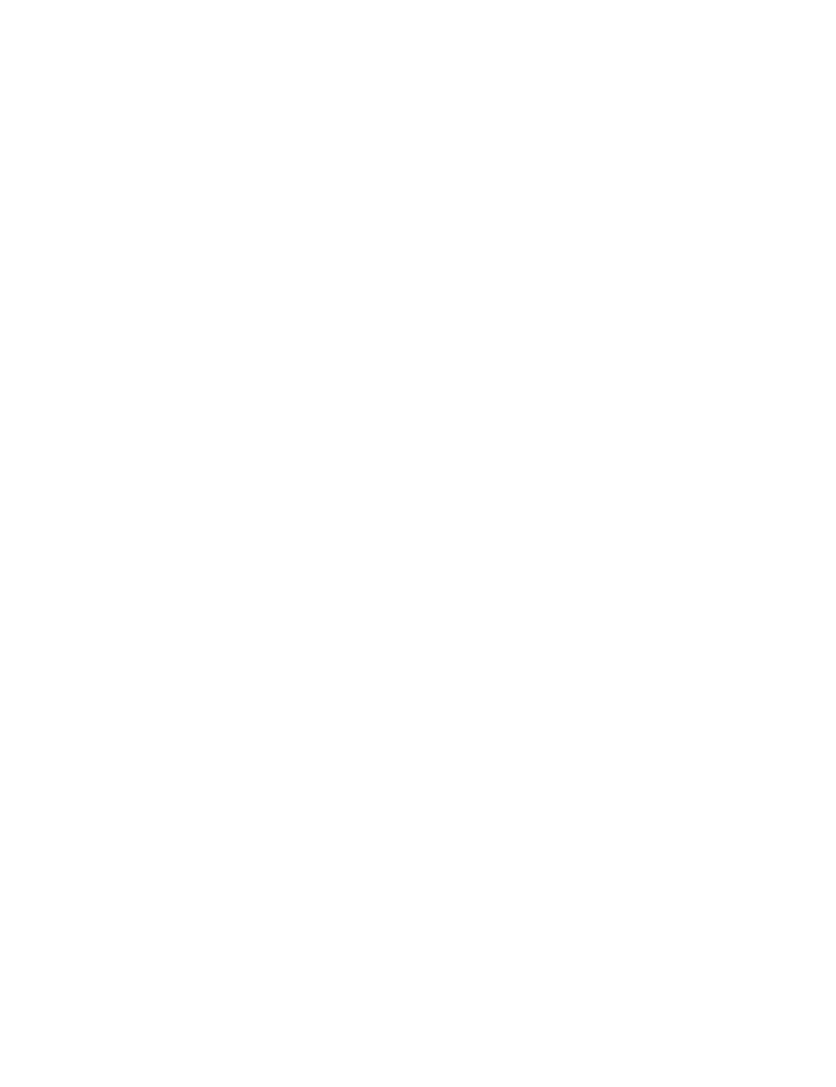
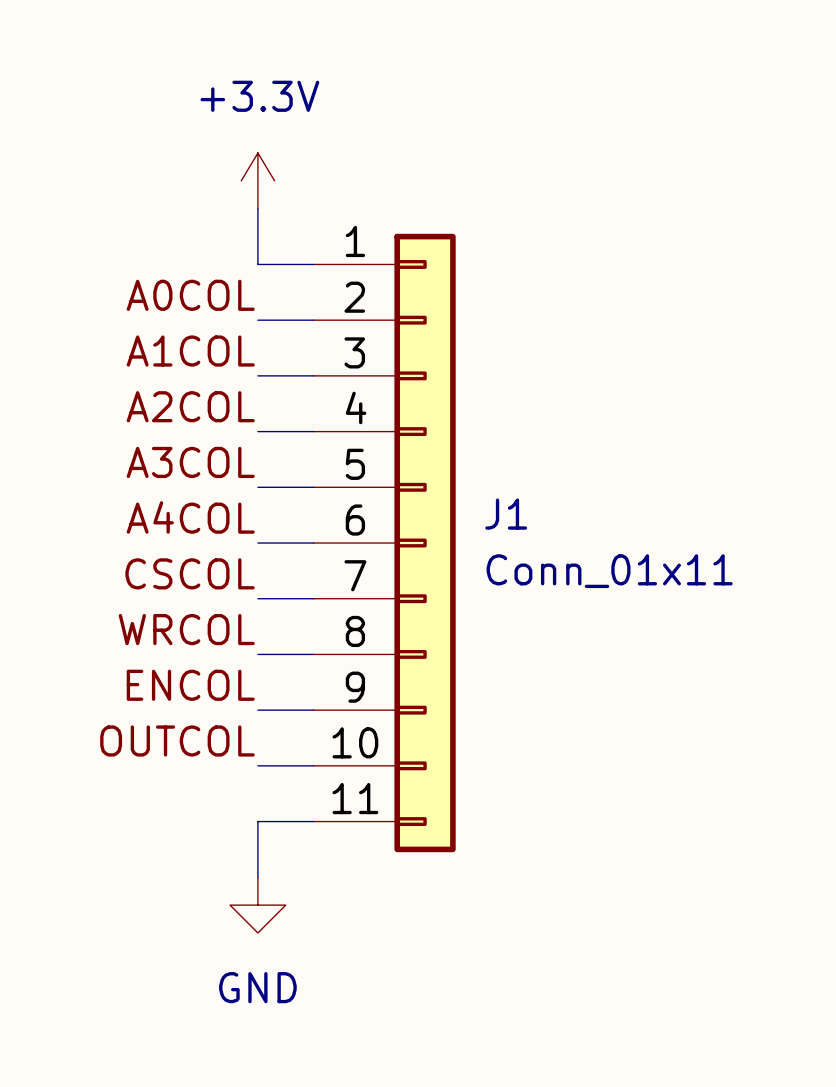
power symbol: none -> +3.3V (257, 180)
wire: none -> (257, 208) (257, 264) (313, 264)
label: none -> A0COL (190, 295)
wire: none -> (257, 320) (313, 320)
label: none -> A1COL (190, 351)
wire: none -> (257, 375) (313, 375)
label: none -> A2COL (190, 406)
wire: none -> (257, 431) (313, 431)
label: none -> A3COL (190, 462)
wire: none -> (257, 487) (313, 487)
label: none -> A4COL (190, 517)
wire: none -> (257, 543) (313, 543)
J1: none -> Conn_01x11 (384, 543)
label: none -> CSCOL (190, 573)
wire: none -> (257, 598) (313, 598)
label: none -> WRCOL (186, 629)
wire: none -> (257, 654) (313, 654)
label: none -> ENCOL (190, 685)
wire: none -> (257, 710) (313, 710)
label: none -> OUTCOL (177, 740)
wire: none -> (257, 765) (313, 765)
wire: none -> (313, 821) (257, 821) (257, 877)
power symbol: none -> GND (257, 905)

